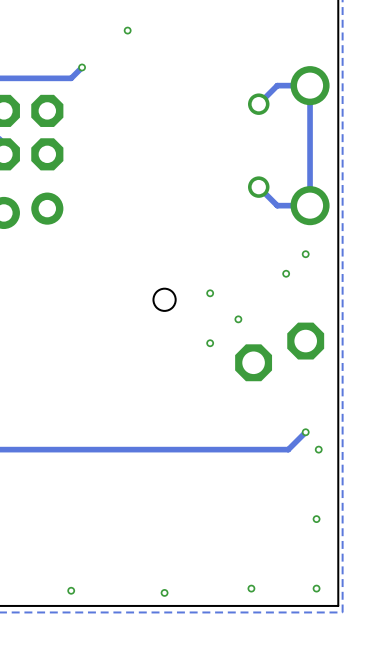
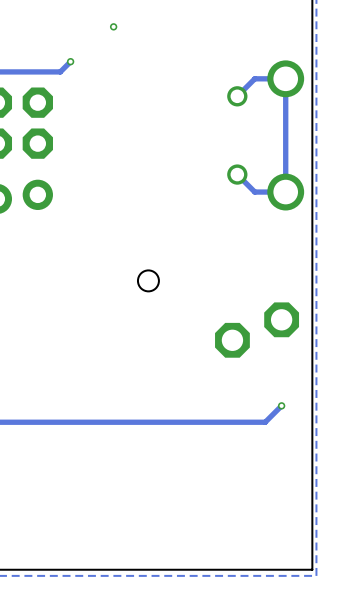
via: (305, 254) -> none
via: (286, 273) -> none
via: (210, 293) -> none
via: (238, 319) -> none
via: (210, 343) -> none
via: (318, 449) -> none
via: (316, 519) -> none
via: (251, 588) -> none
via: (316, 588) -> none
via: (71, 590) -> none
via: (164, 592) -> none

